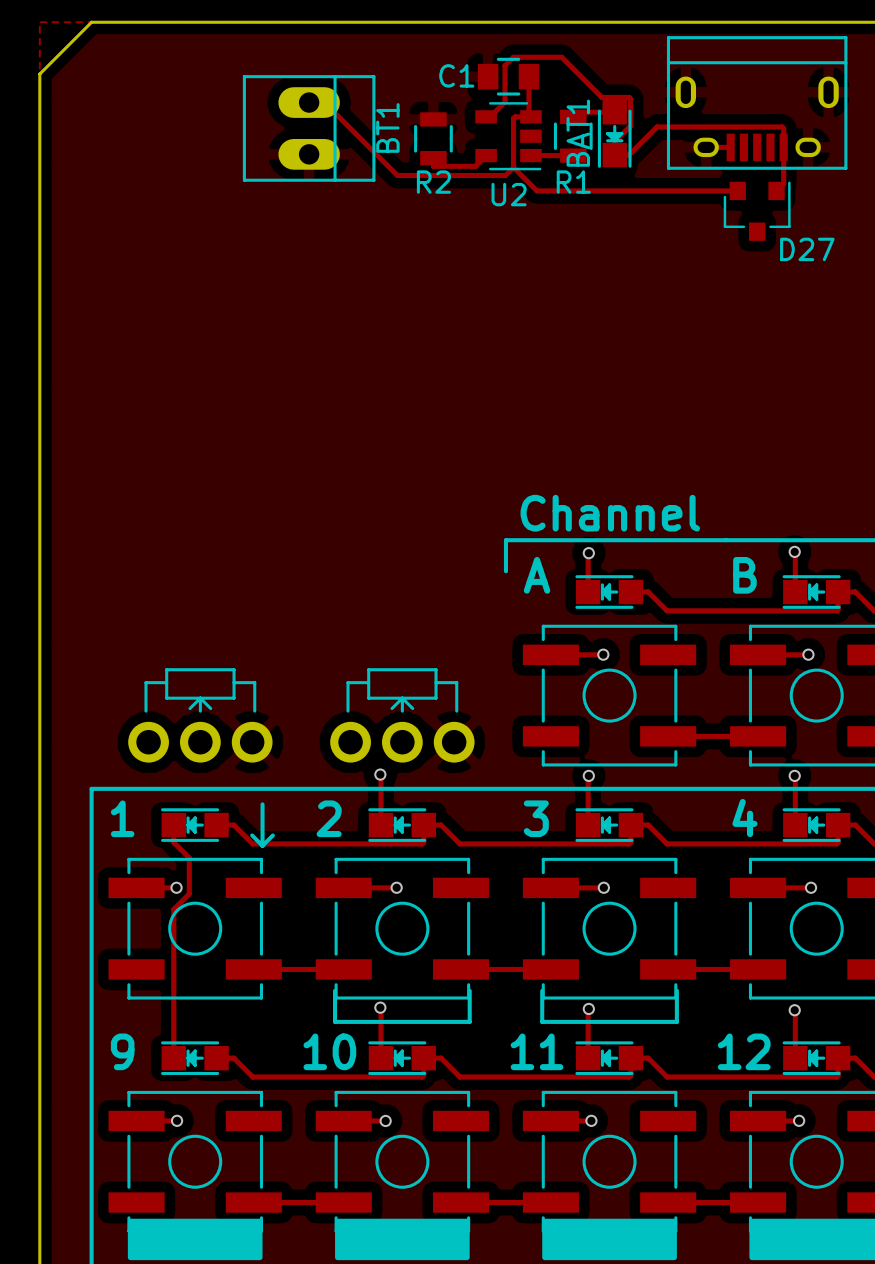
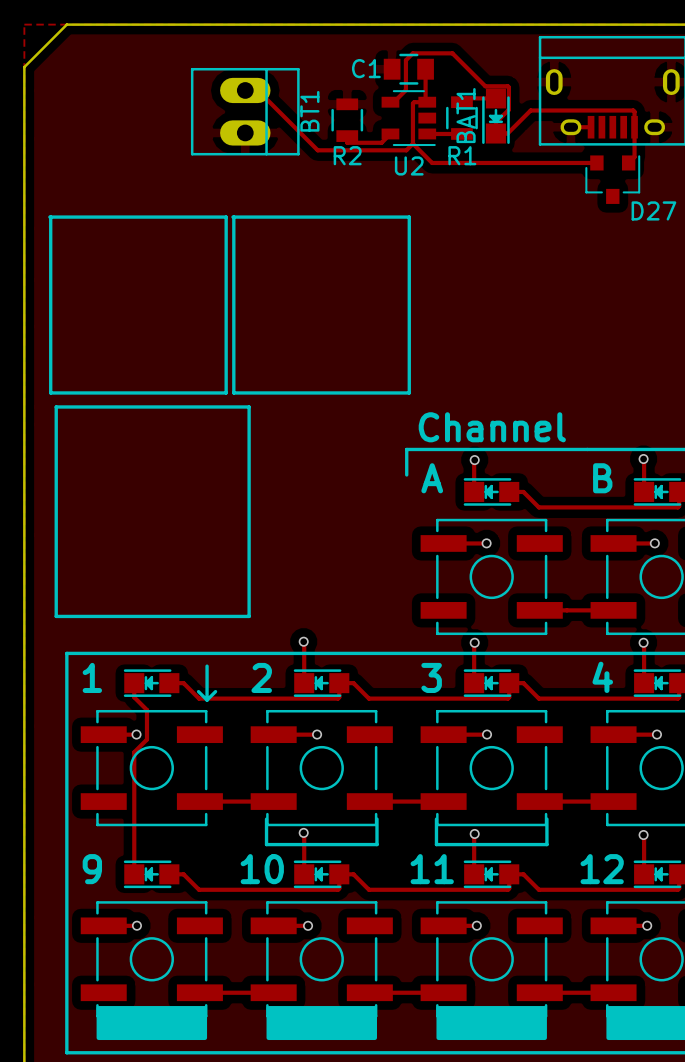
line: none -> (49, 217) (226, 217) (226, 392) (50, 392) (50, 217)
line: none -> (232, 217) (409, 217) (409, 392) (233, 392) (233, 217)
line: none -> (56, 406) (249, 406) (249, 616) (56, 616) (56, 406)
part: (200, 715) -> none
part: (402, 715) -> none

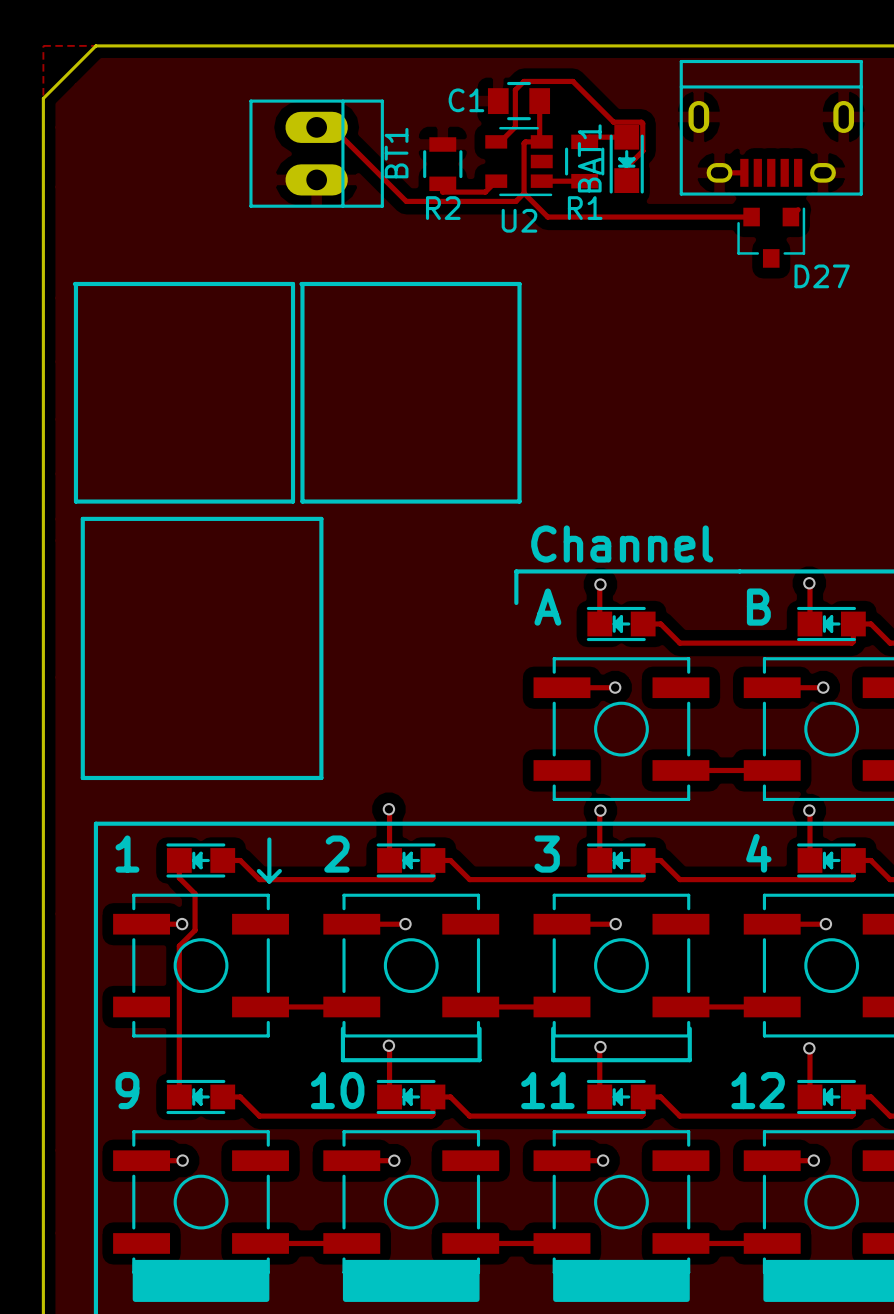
track: (634, 119) (633, 110) (530, 110) (507, 133) (495, 133) -> none
track: (634, 127) (634, 157) -> none

